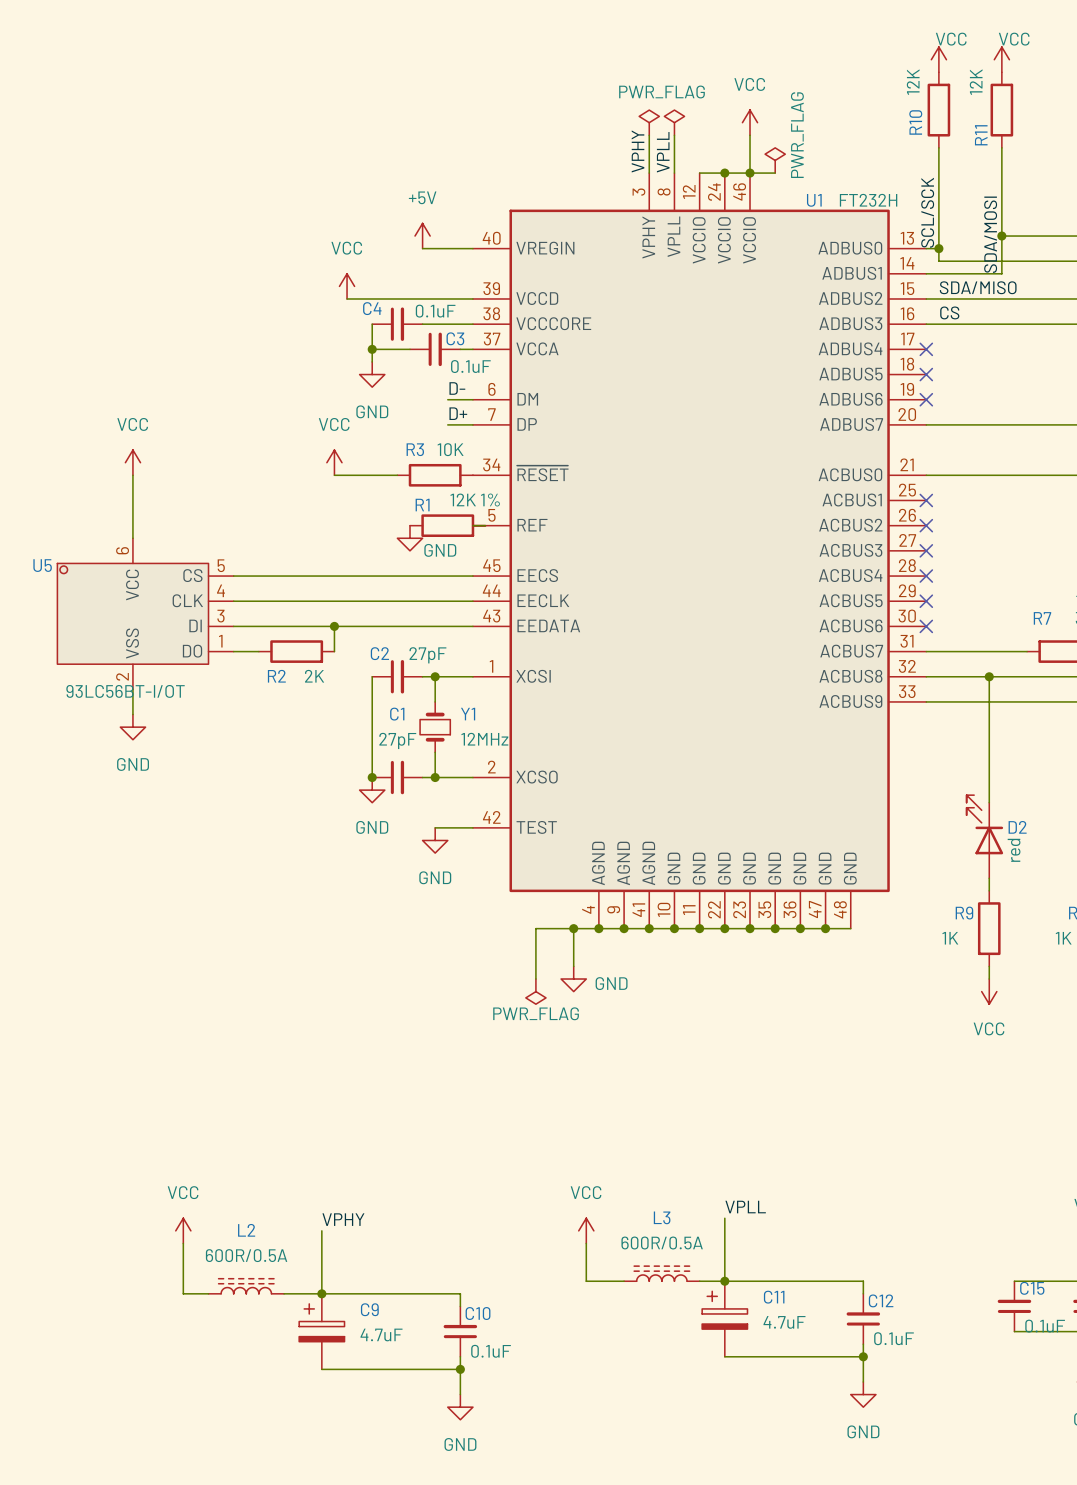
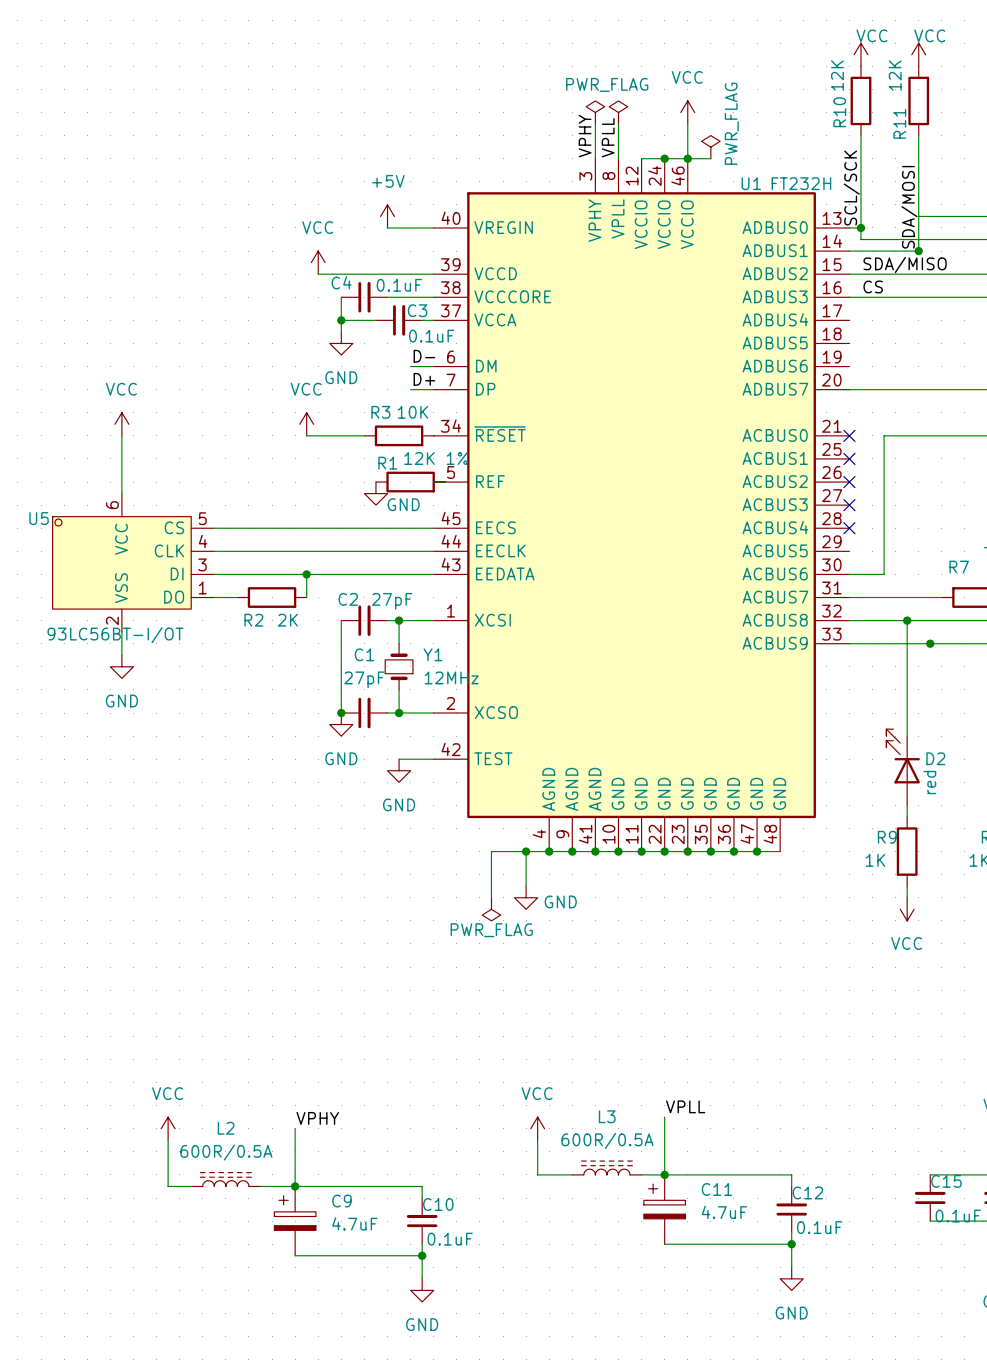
junction position: (1001, 236) -> (918, 251)
no-connect mark: (926, 349) -> none
no-connect mark: (926, 374) -> none
no-connect mark: (926, 399) -> none
wire: (926, 475) (964, 475) -> (849, 574) (884, 574) (884, 435)
no-connect mark: none -> (849, 435)
no-connect mark: (926, 601) -> none
no-connect mark: (926, 626) -> none
junction: none -> (930, 643)

